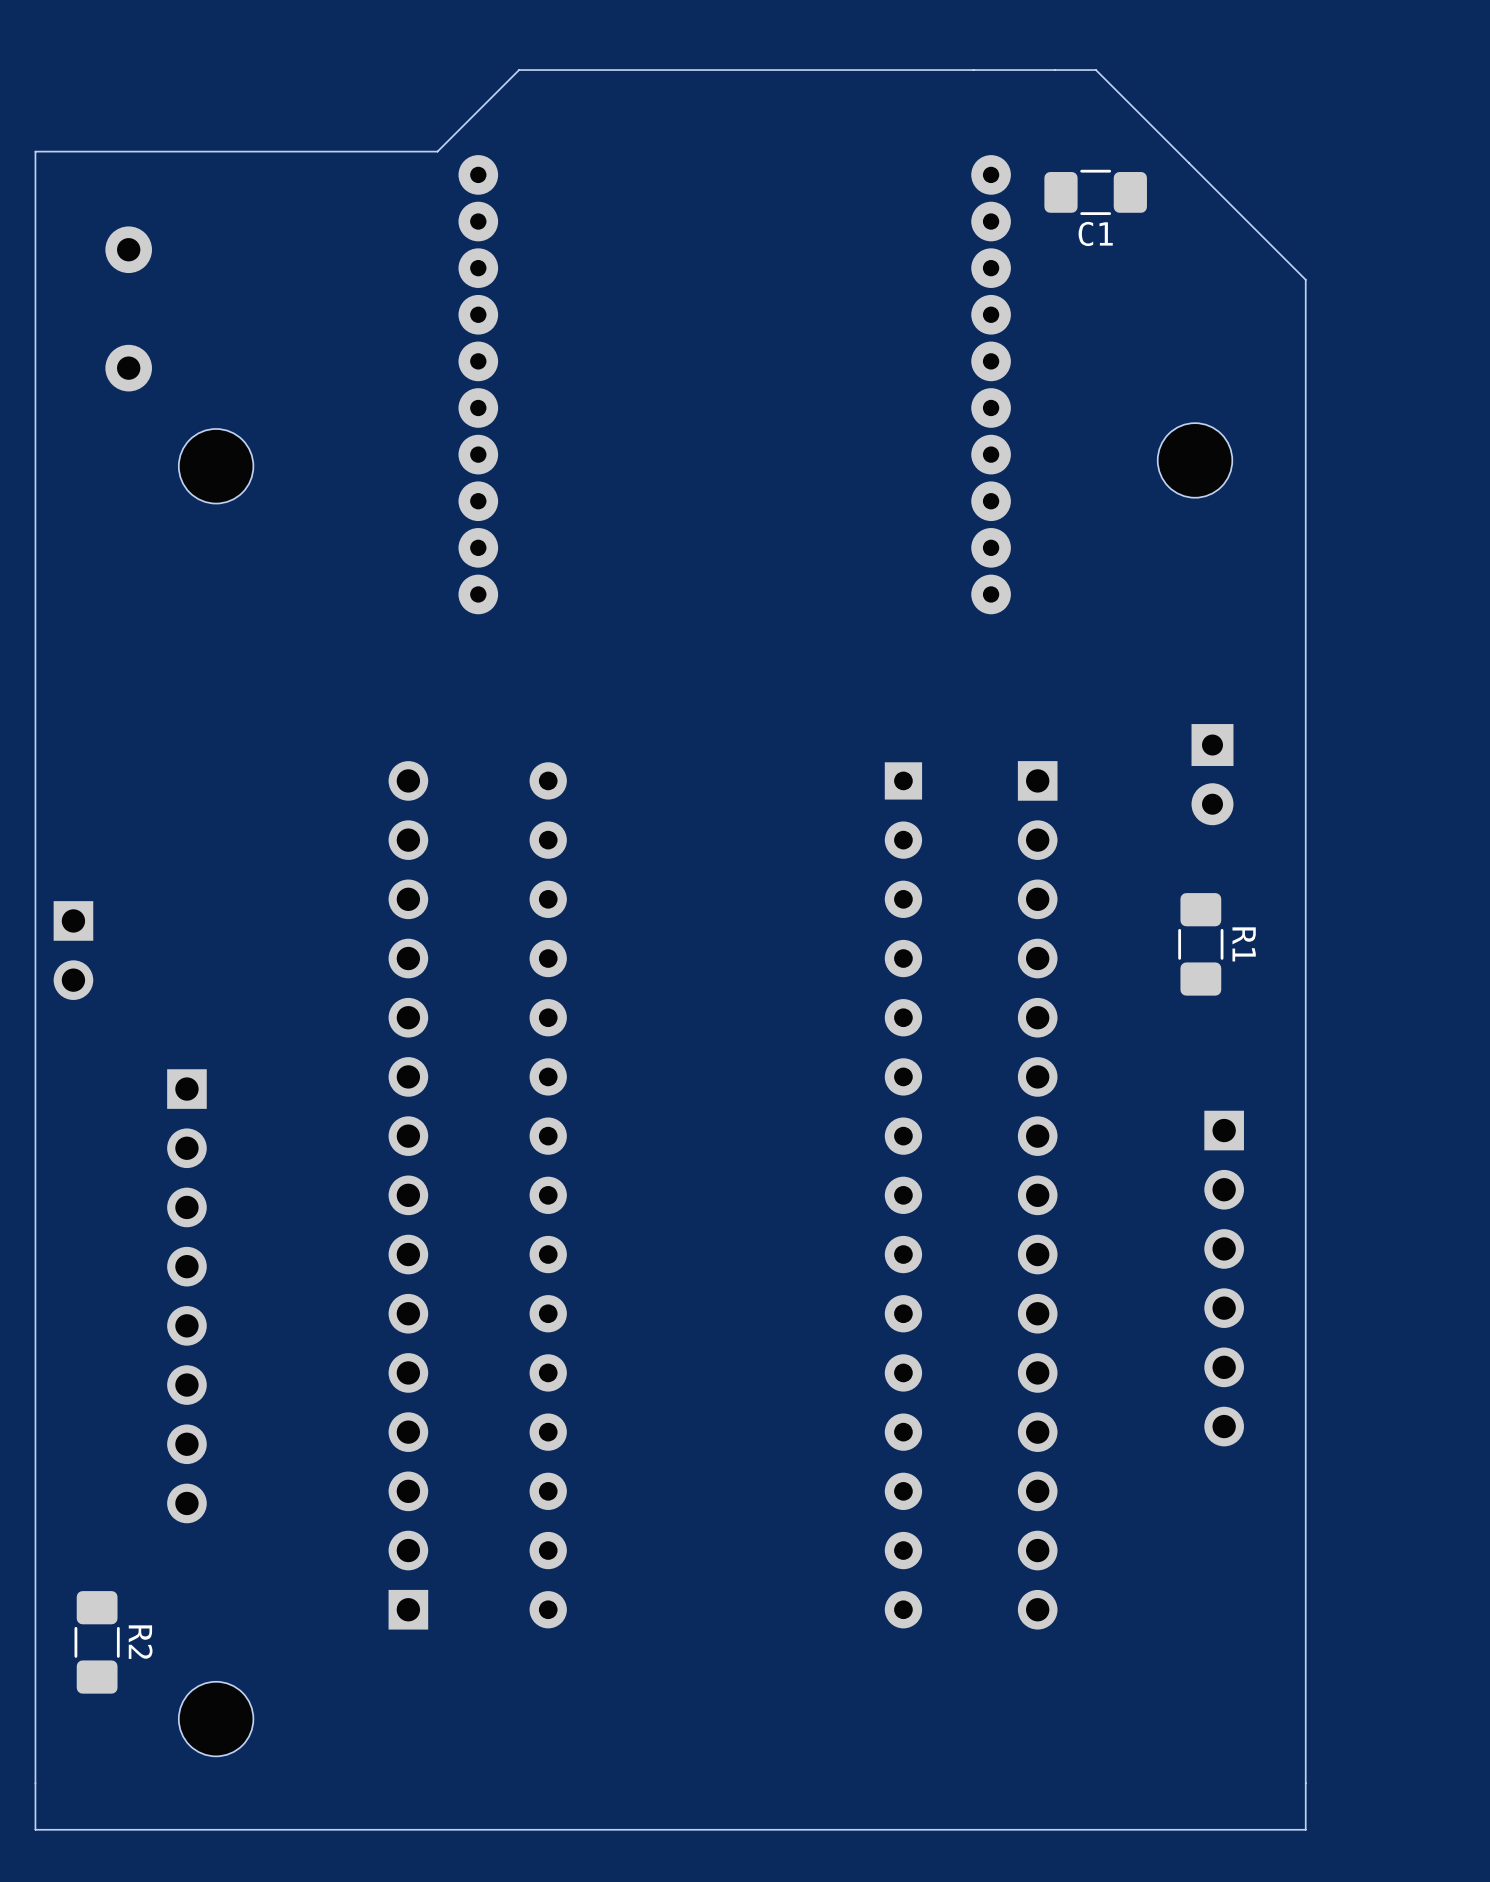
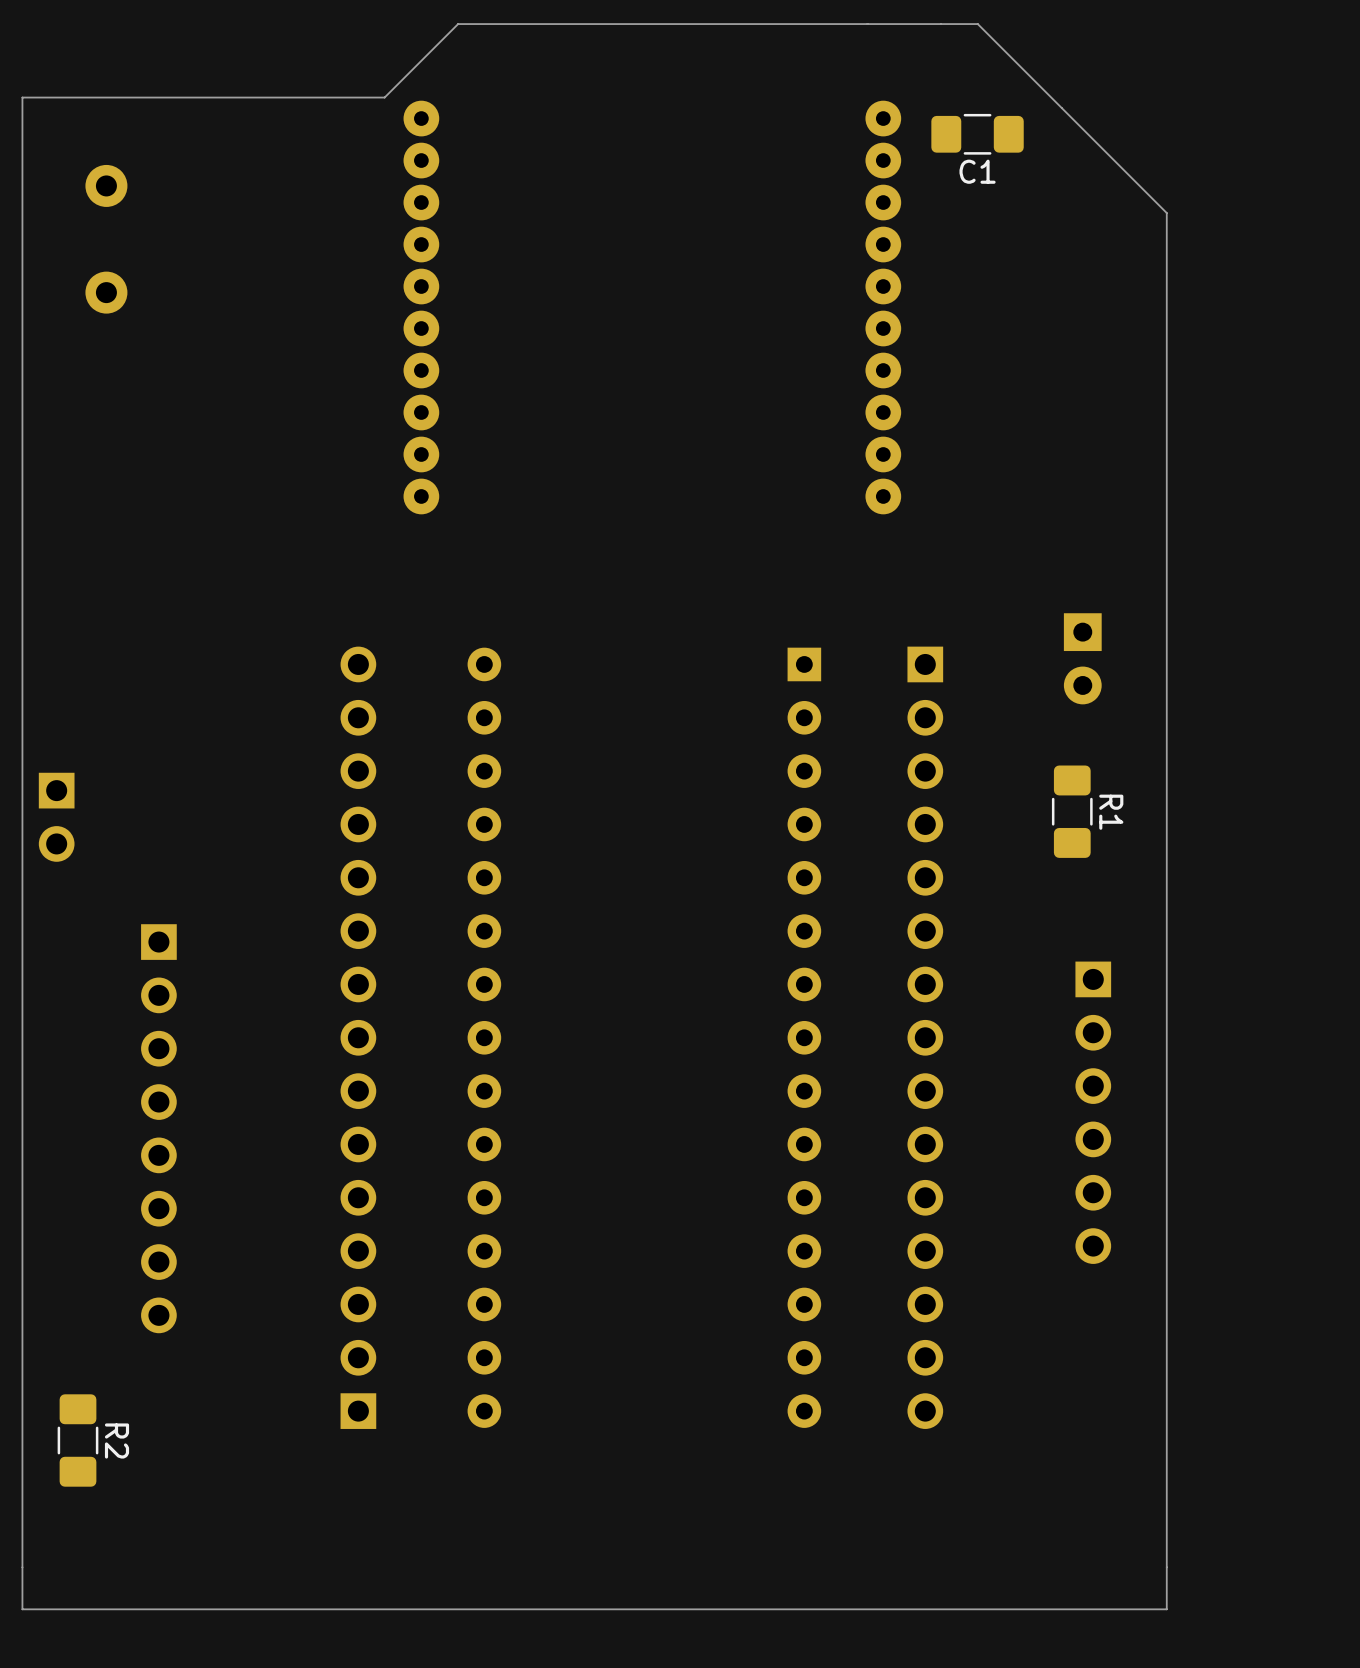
part: (1195, 460) -> none
part: (216, 466) -> none
part: (216, 1719) -> none

